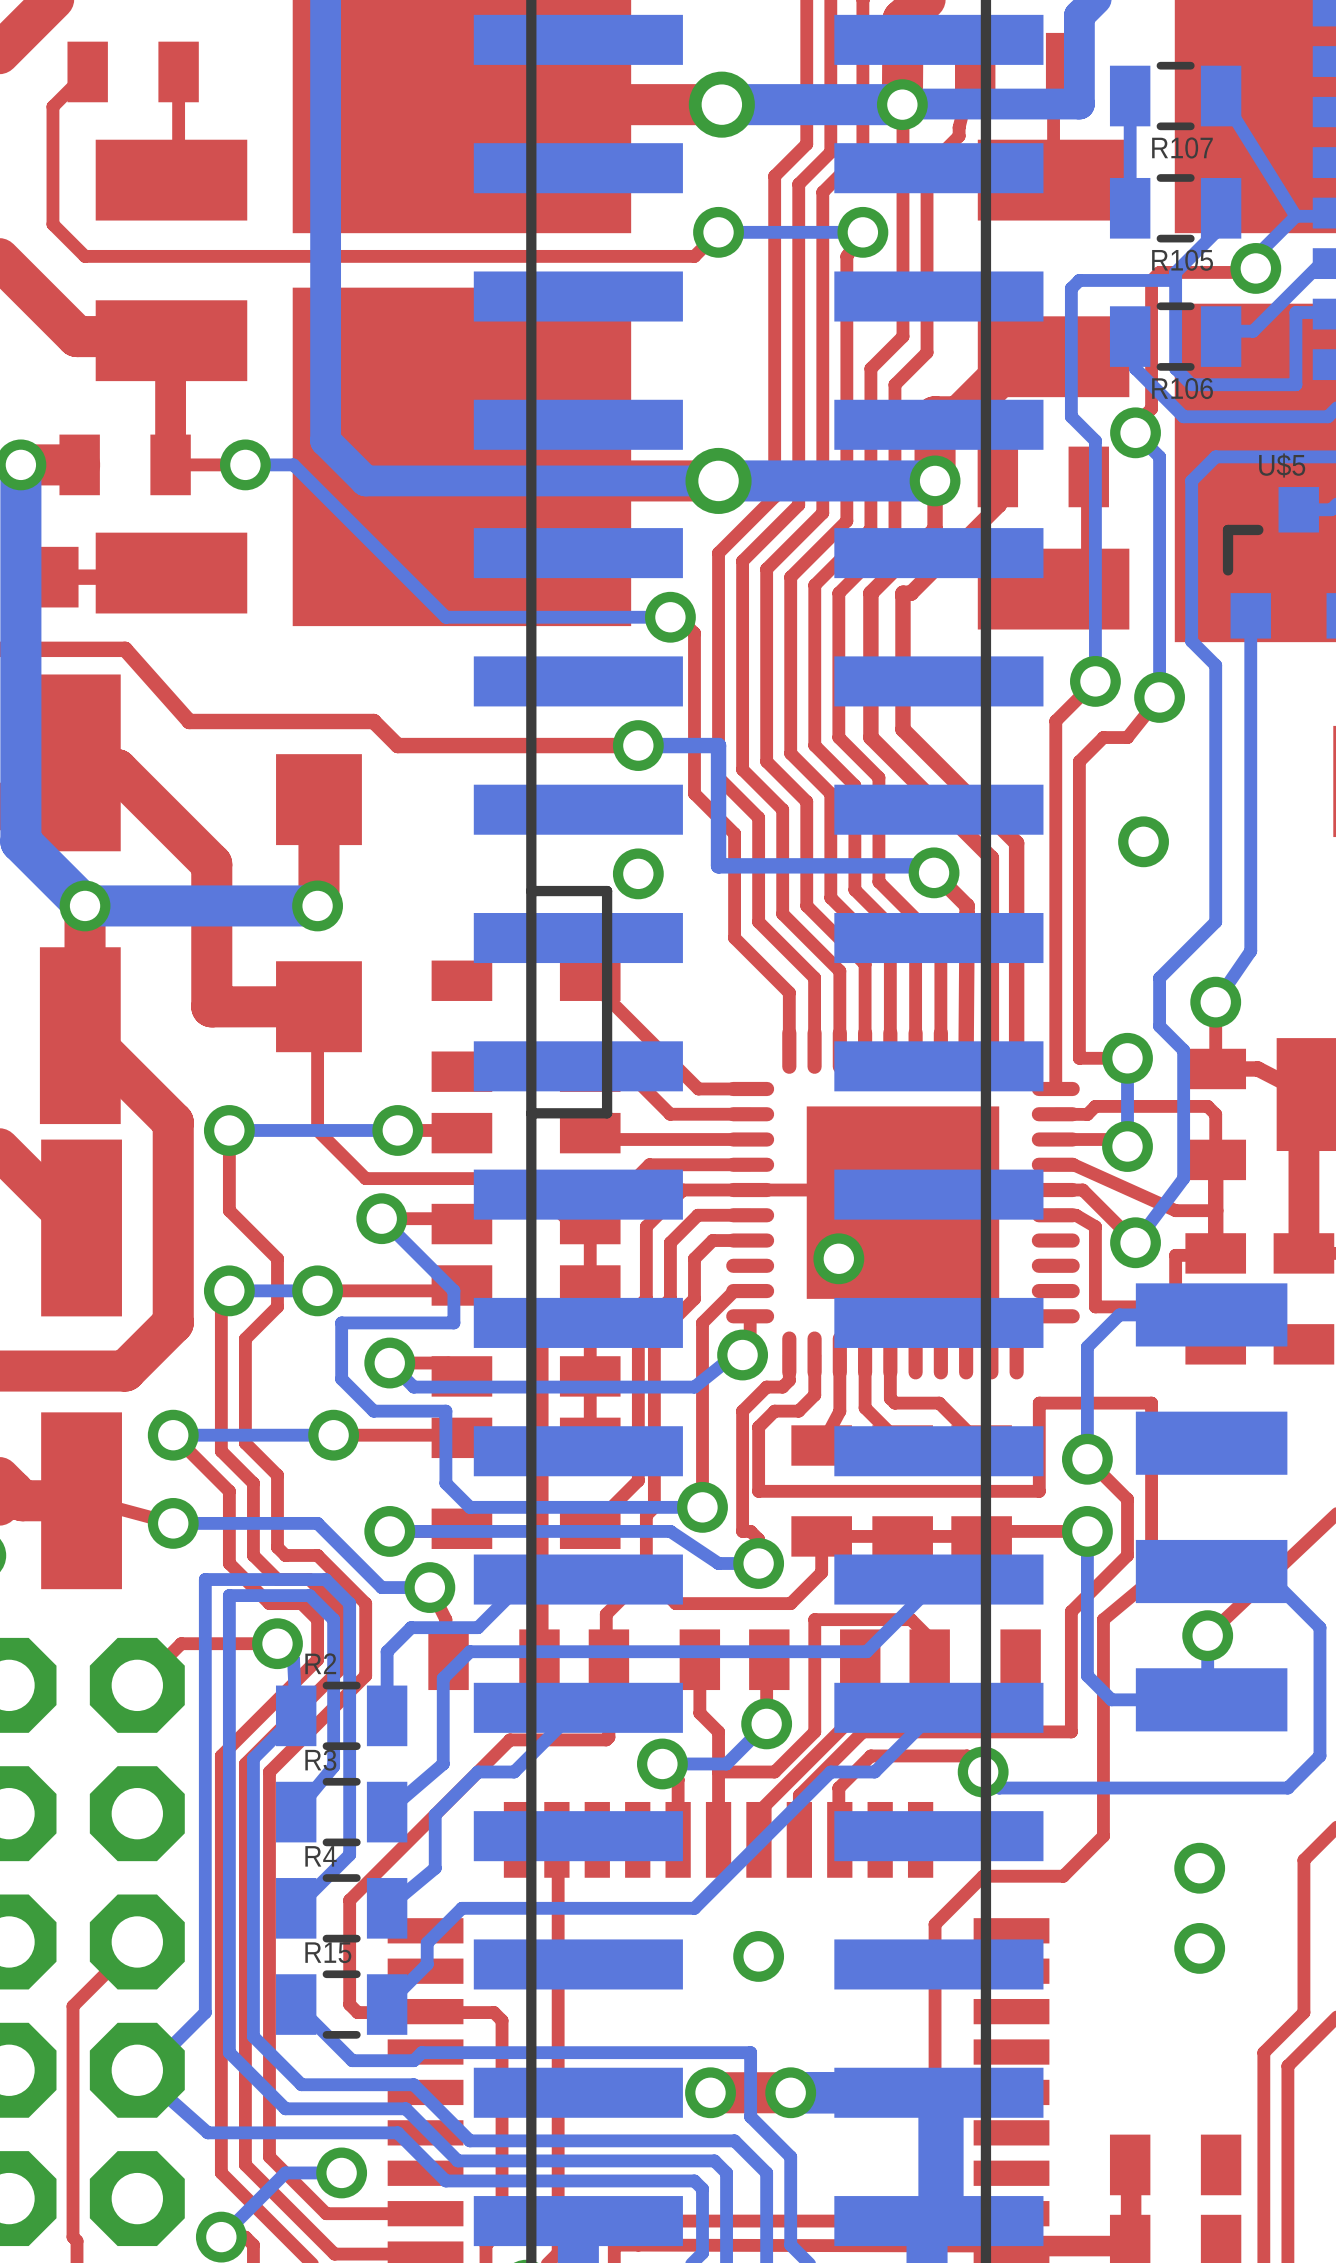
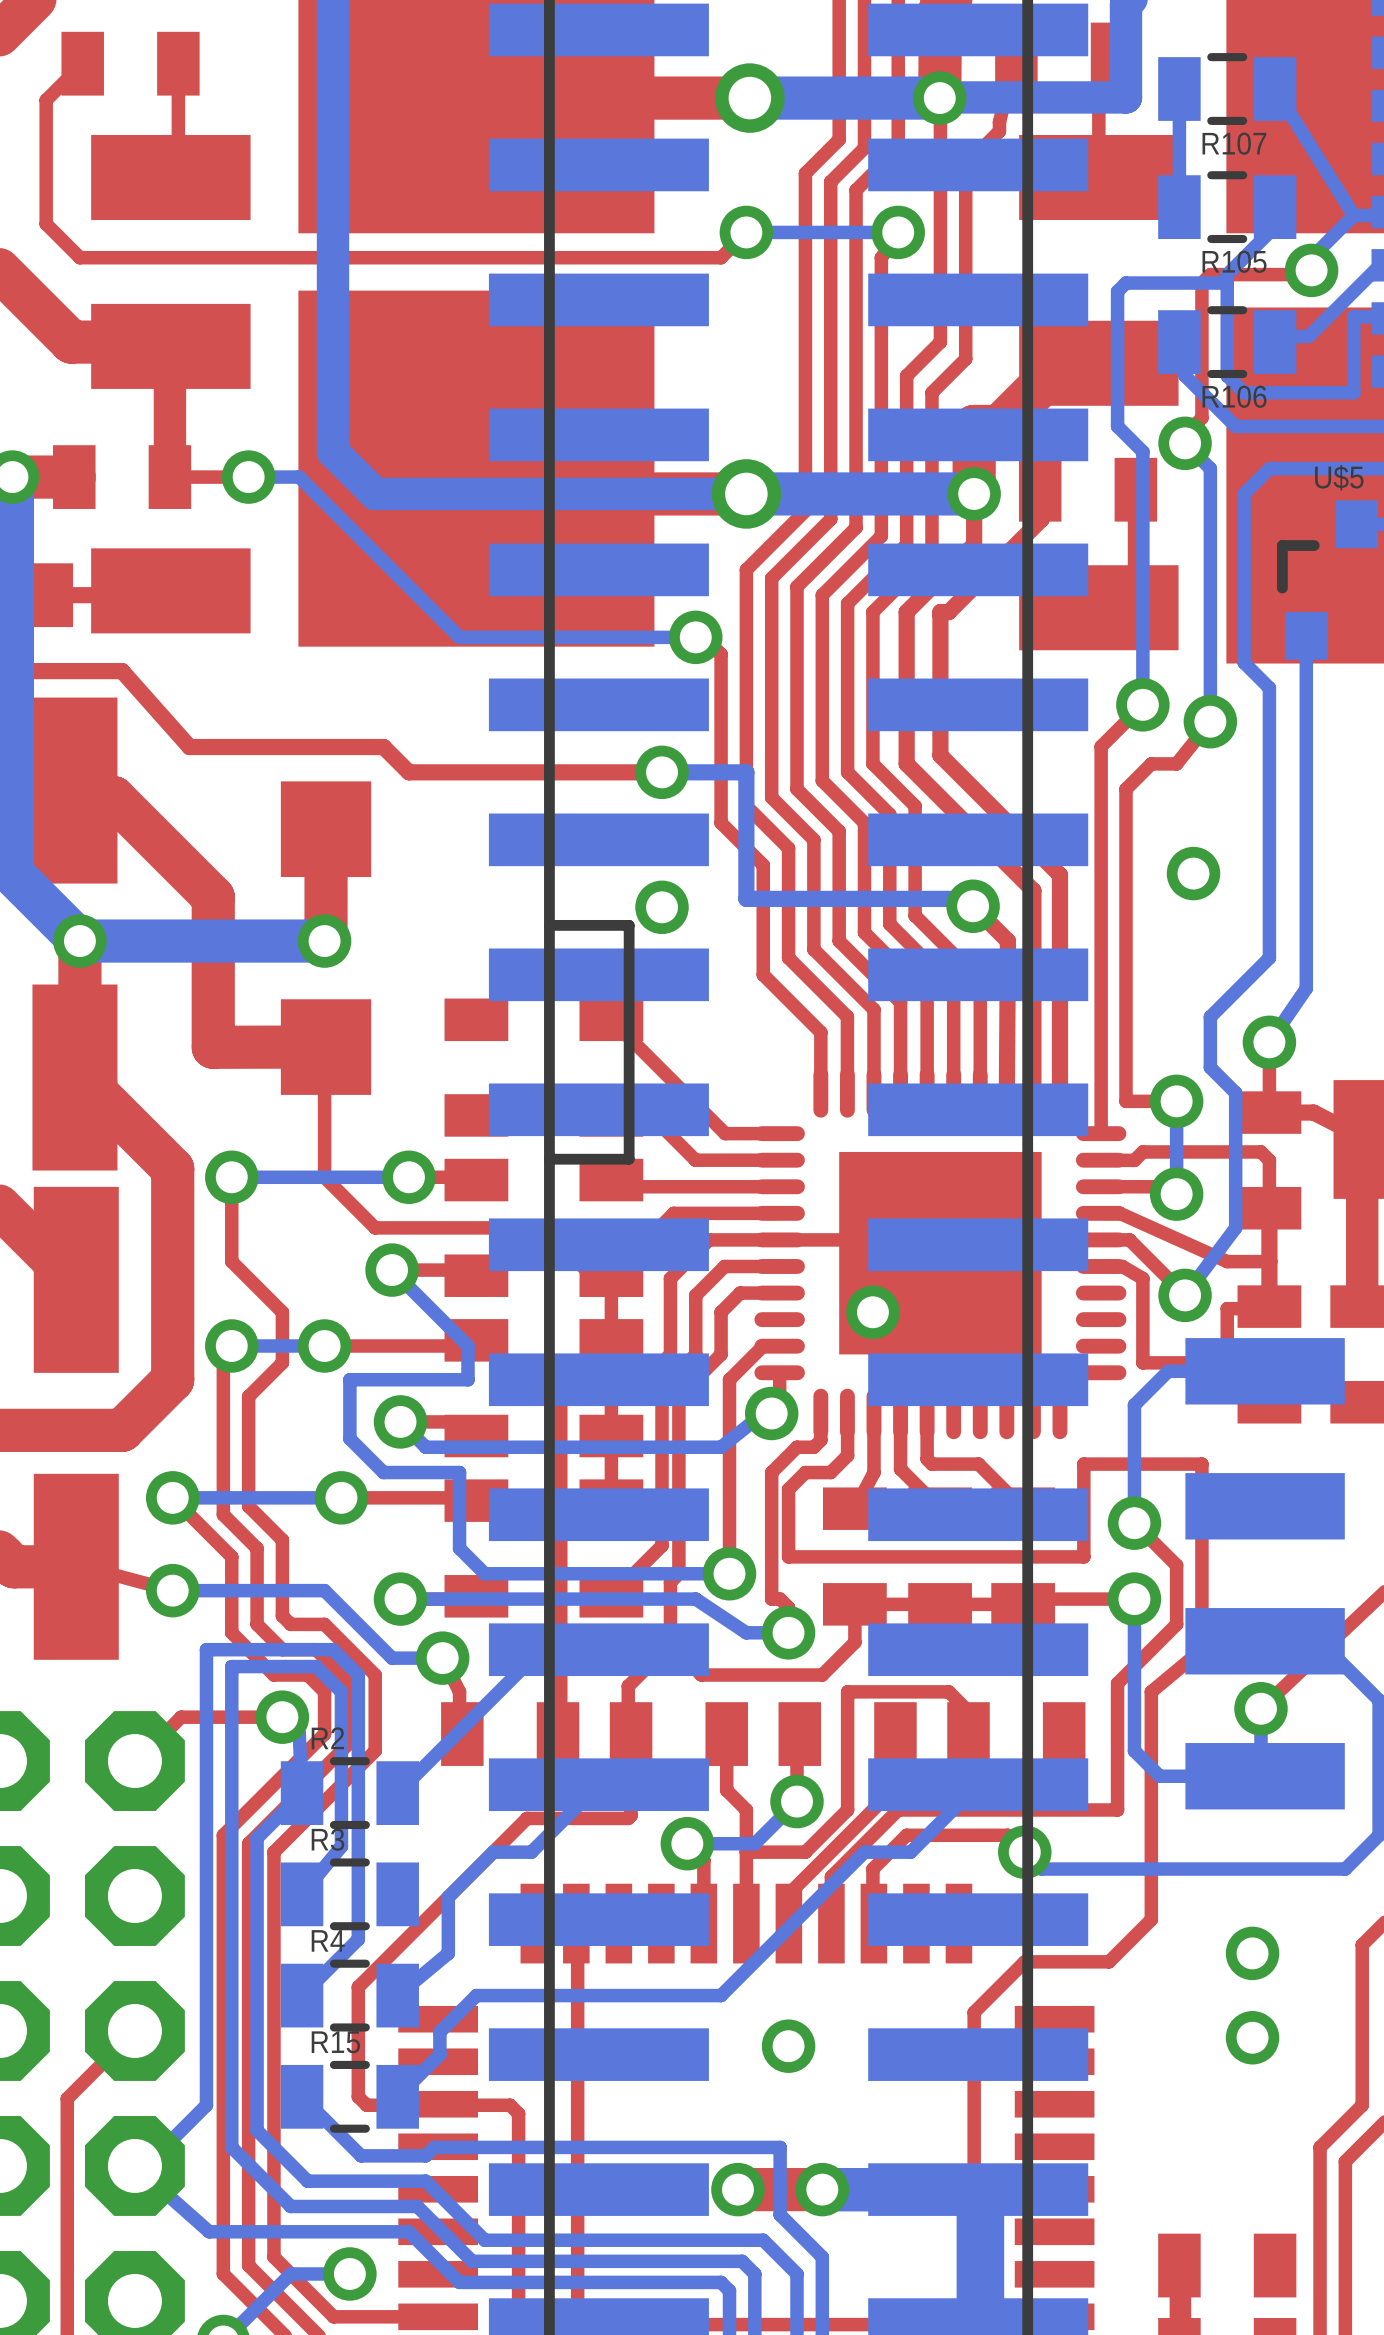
bottom track: (526, 1579) (477, 1627) (411, 1627) (387, 1651) (387, 1715) -> (543, 1649) (541, 1649) (397, 1793)
bottom track: (938, 1579) (866, 1651) (469, 1651) (443, 1678) (443, 1763) (387, 1812) -> none

